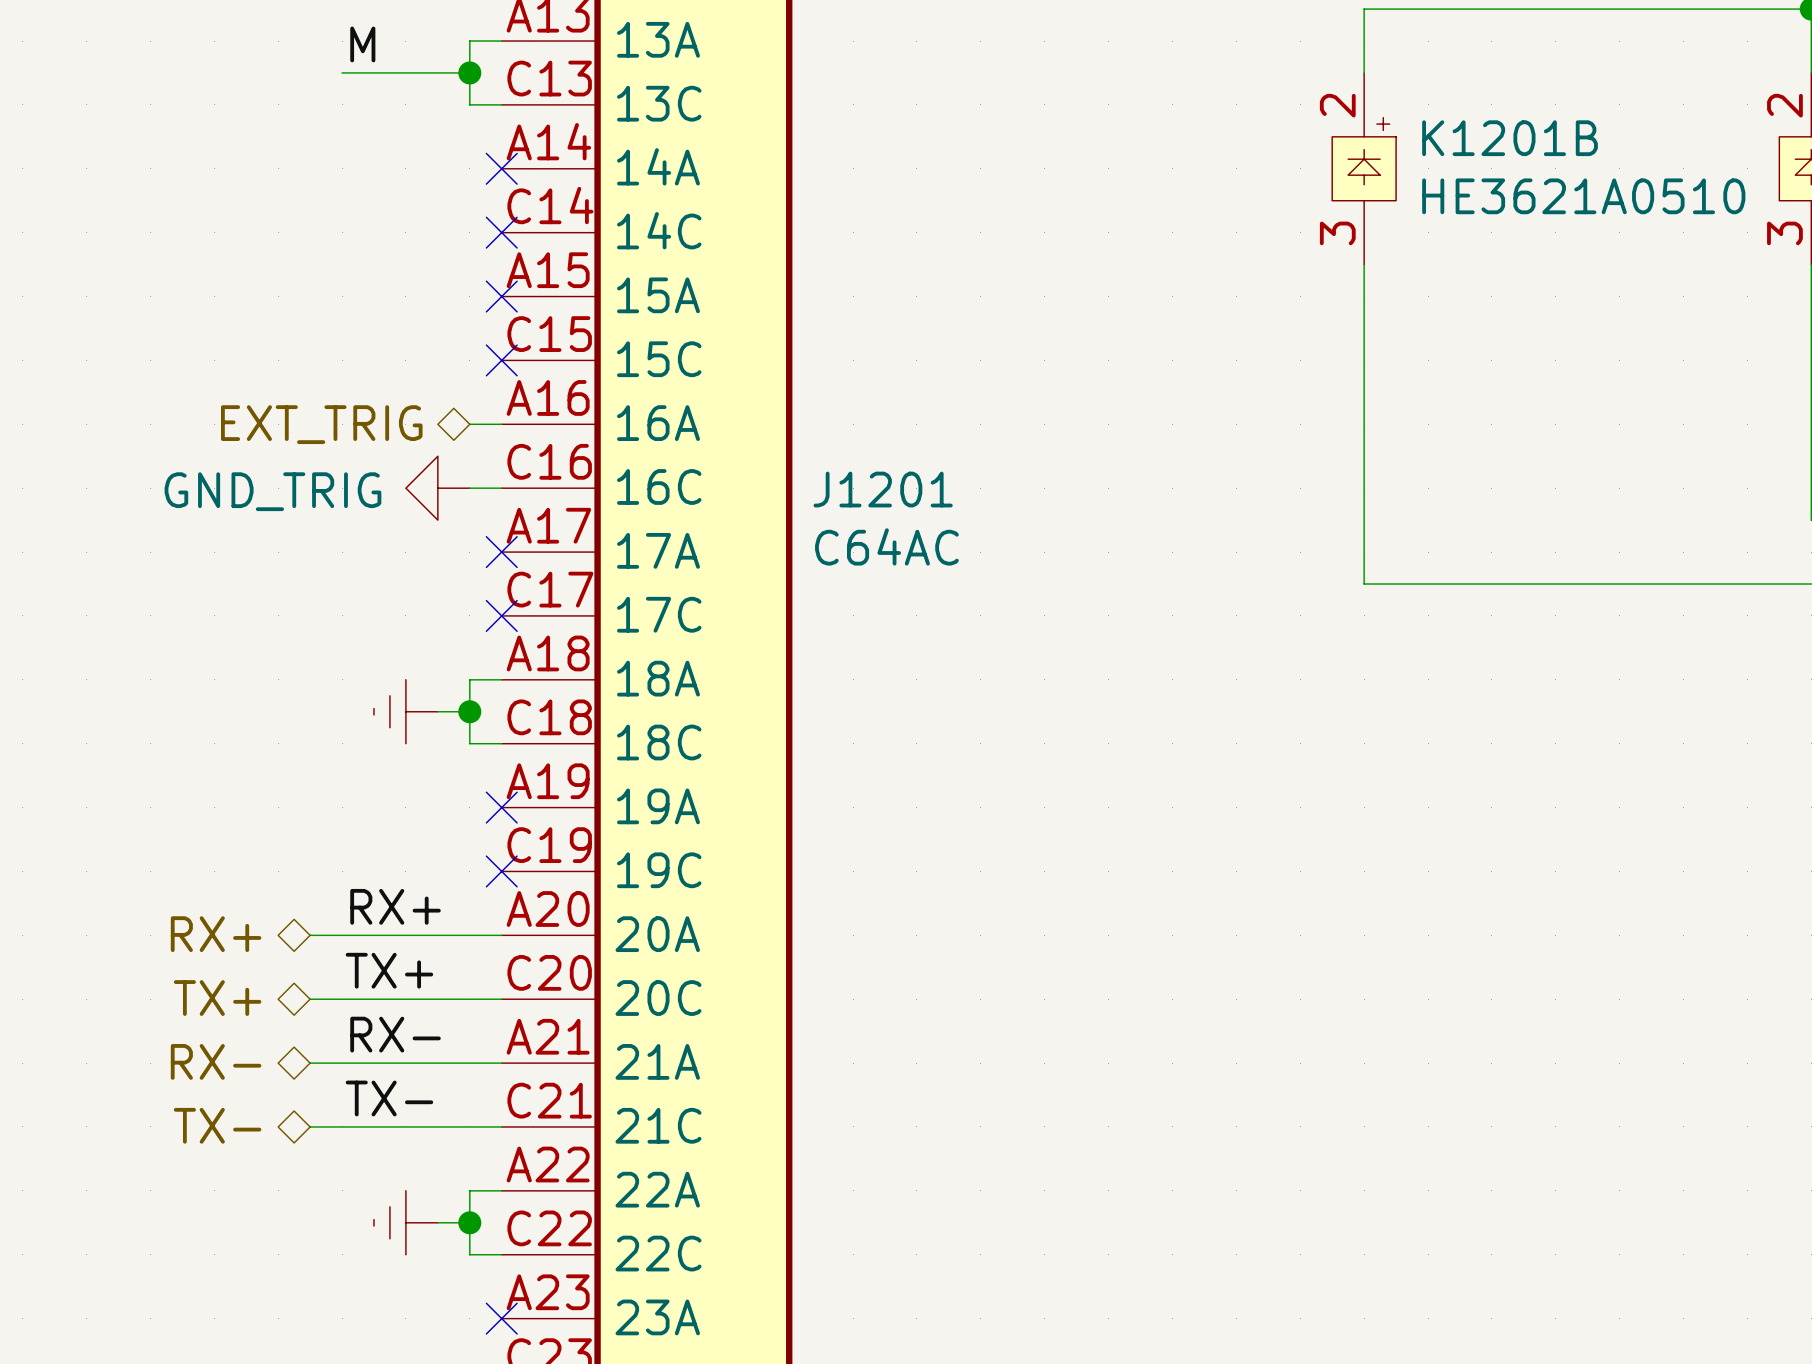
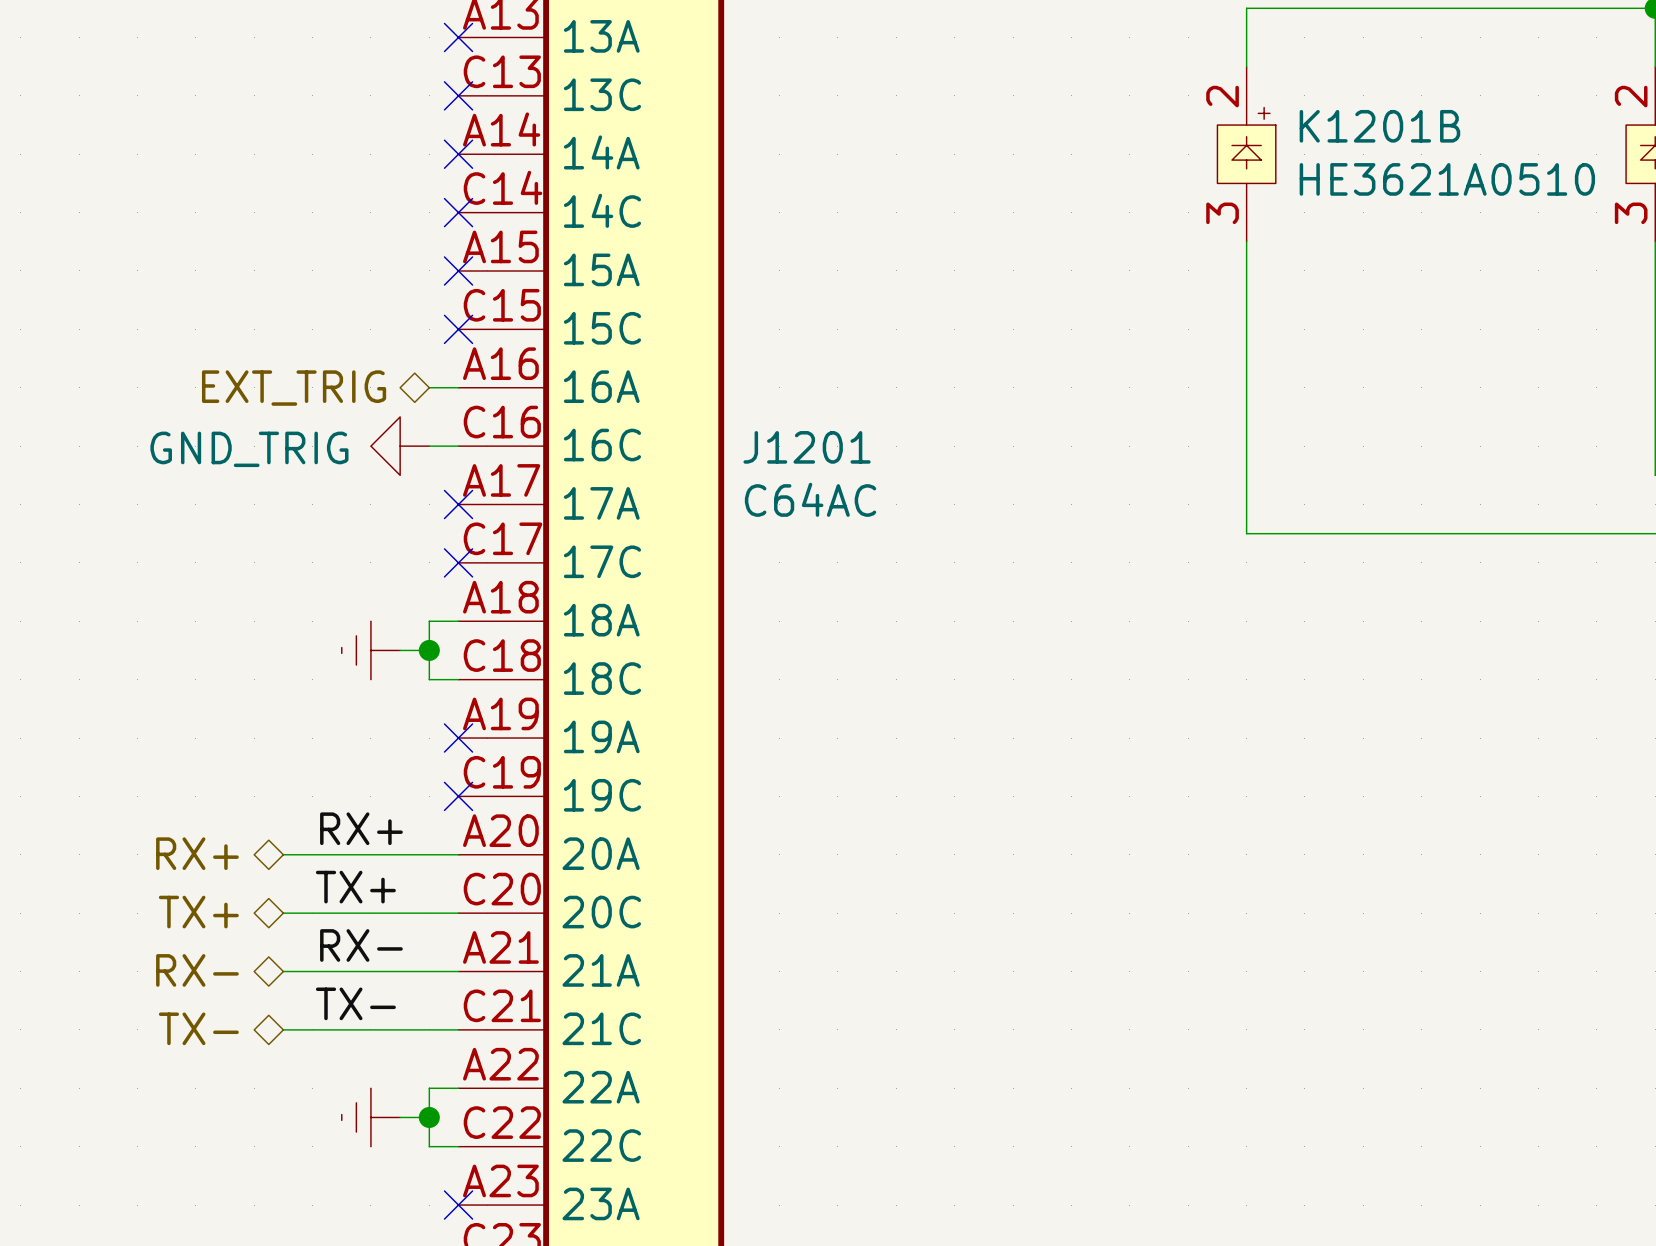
wire: (501, 41) (469, 41) (469, 104) (501, 104) -> none
no-connect mark: none -> (458, 37)
label: M (362, 44) -> none
wire: (342, 72) (469, 72) -> none
junction: (469, 72) -> none
no-connect mark: none -> (458, 95)

